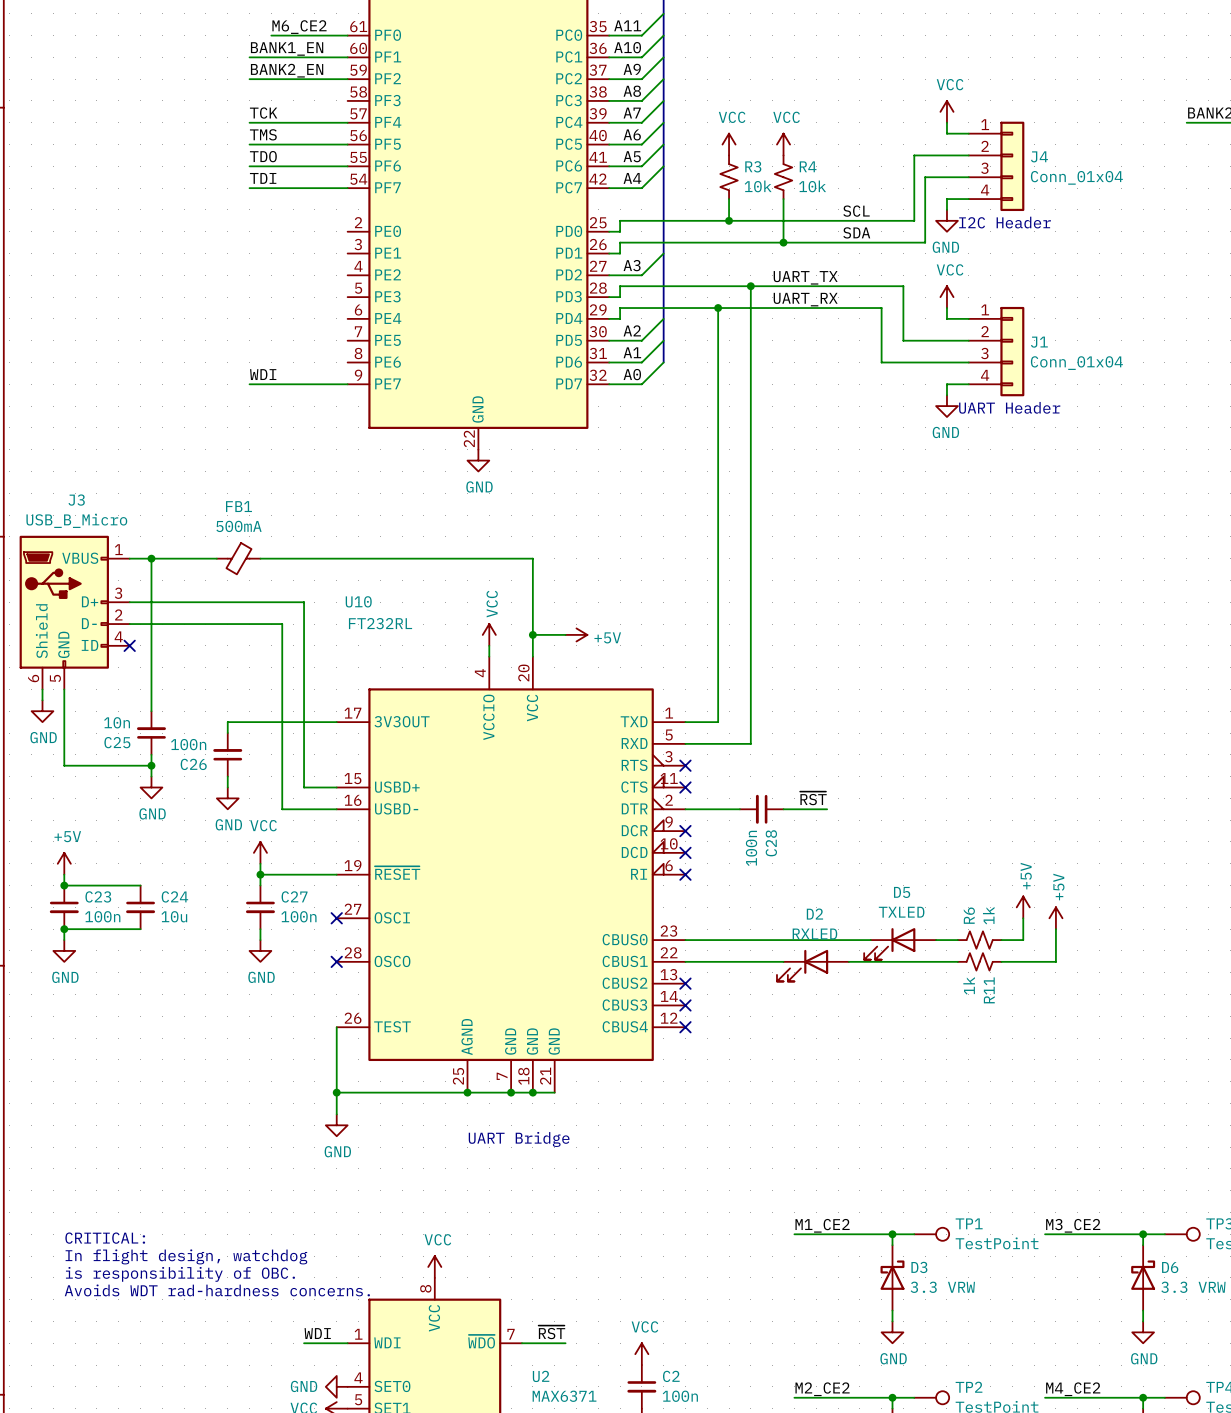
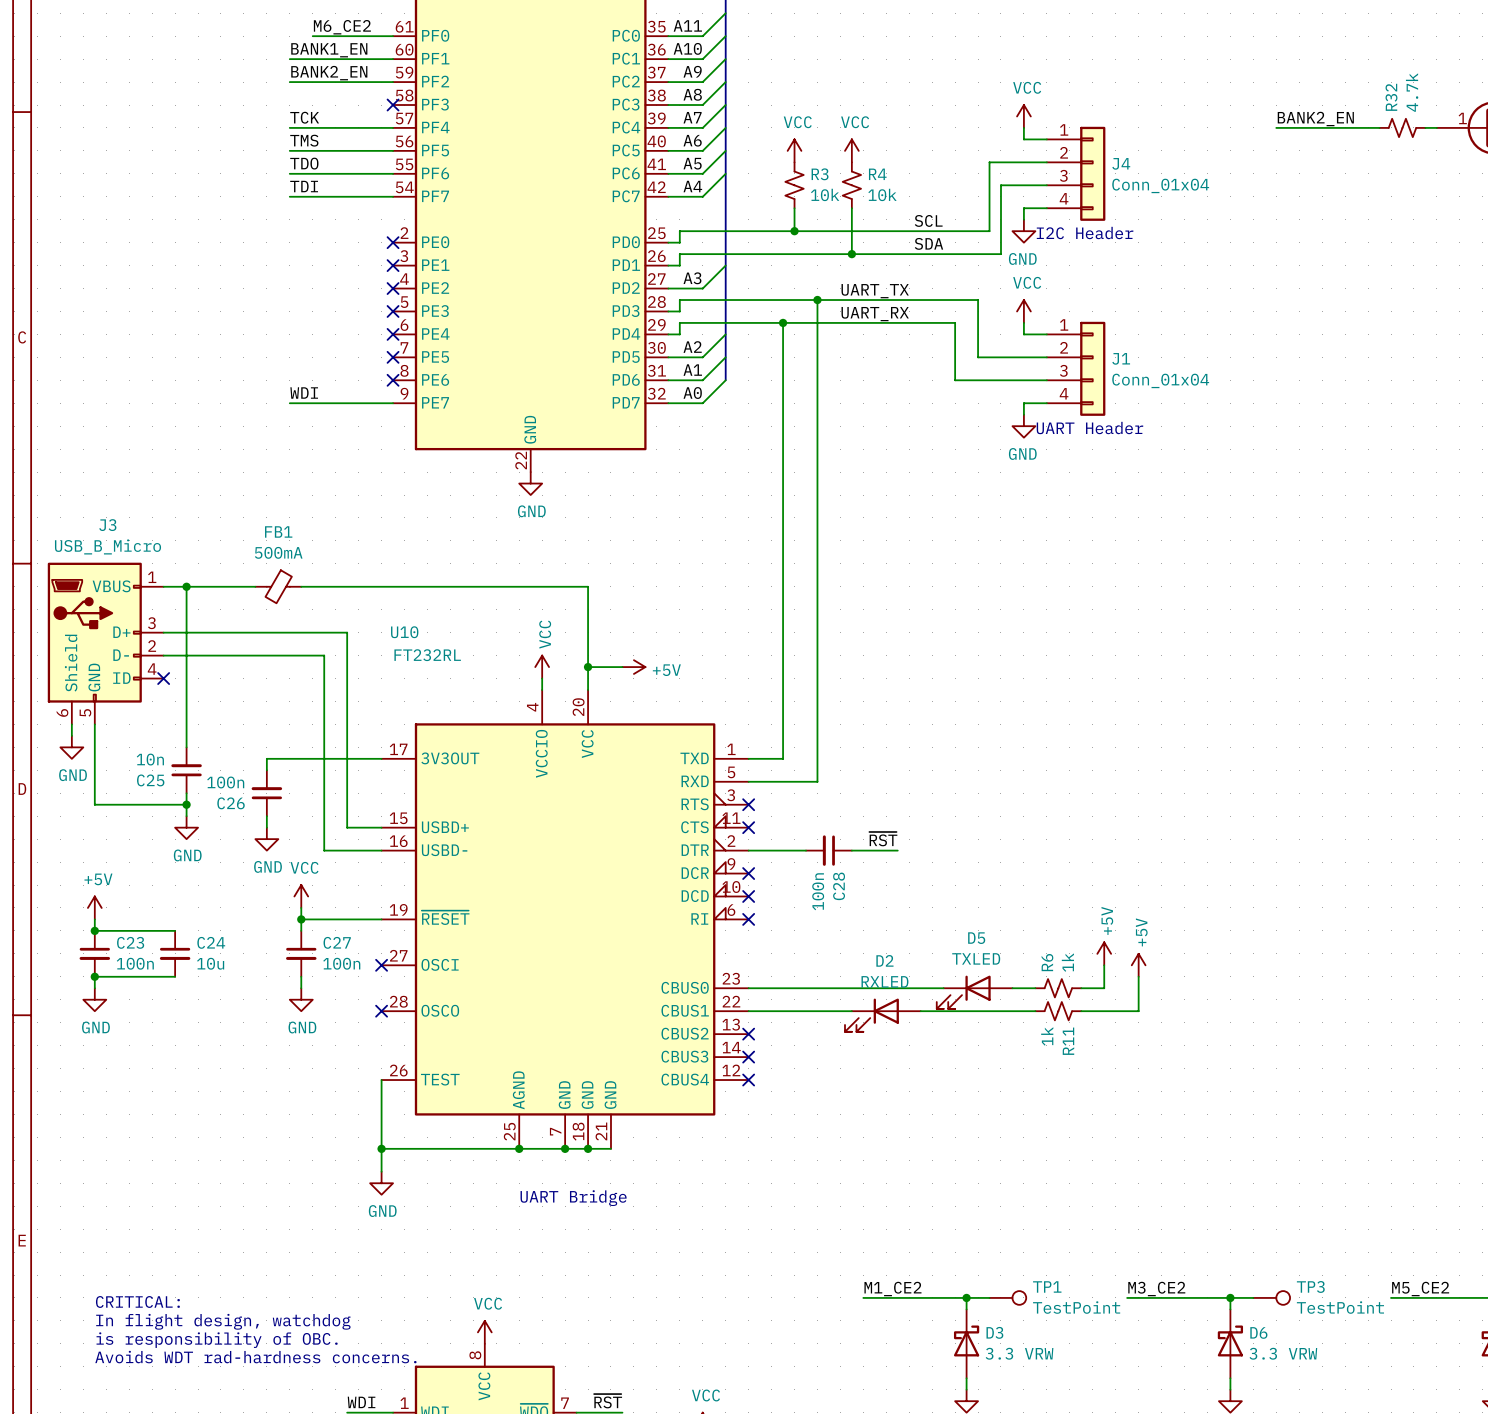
no-connect mark: none -> (393, 105)
no-connect mark: none -> (393, 242)
no-connect mark: none -> (393, 265)
no-connect mark: none -> (393, 288)
no-connect mark: none -> (393, 311)
no-connect mark: none -> (393, 334)
no-connect mark: none -> (393, 357)
no-connect mark: none -> (393, 380)

